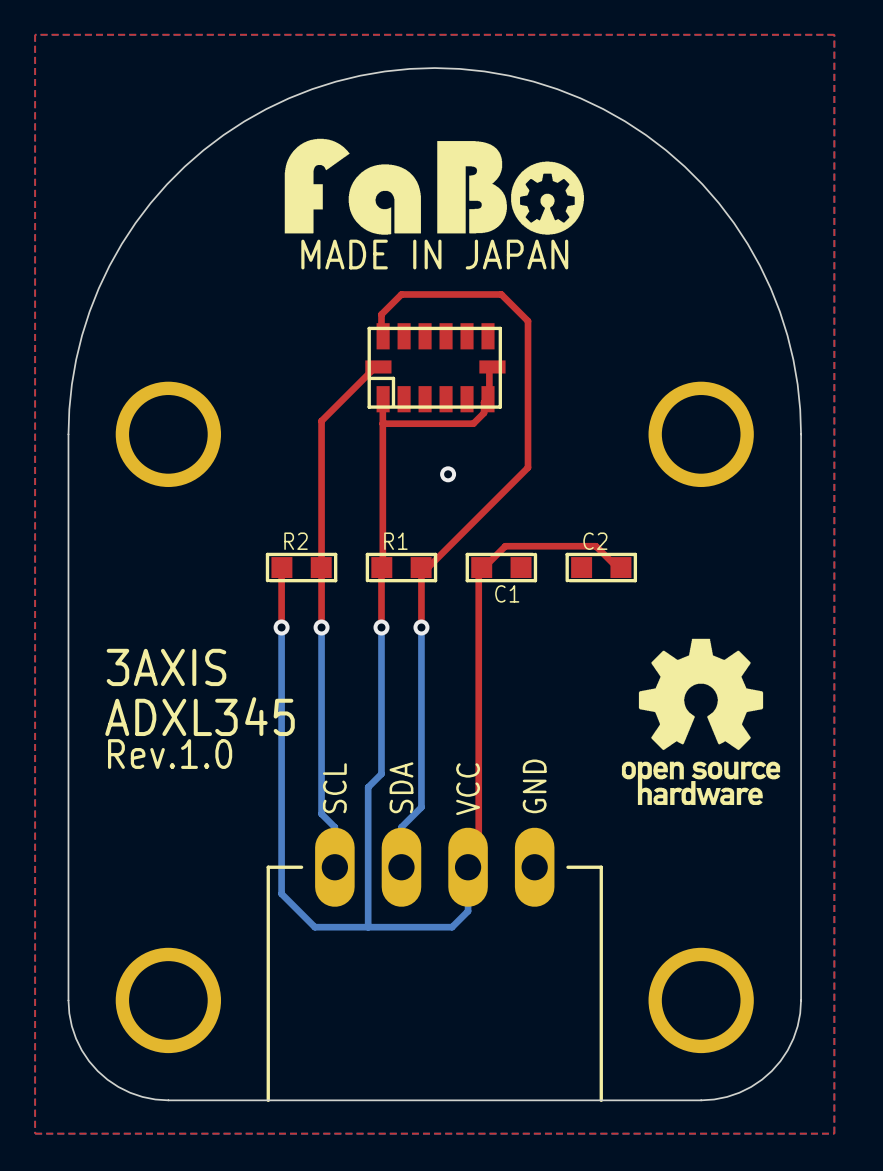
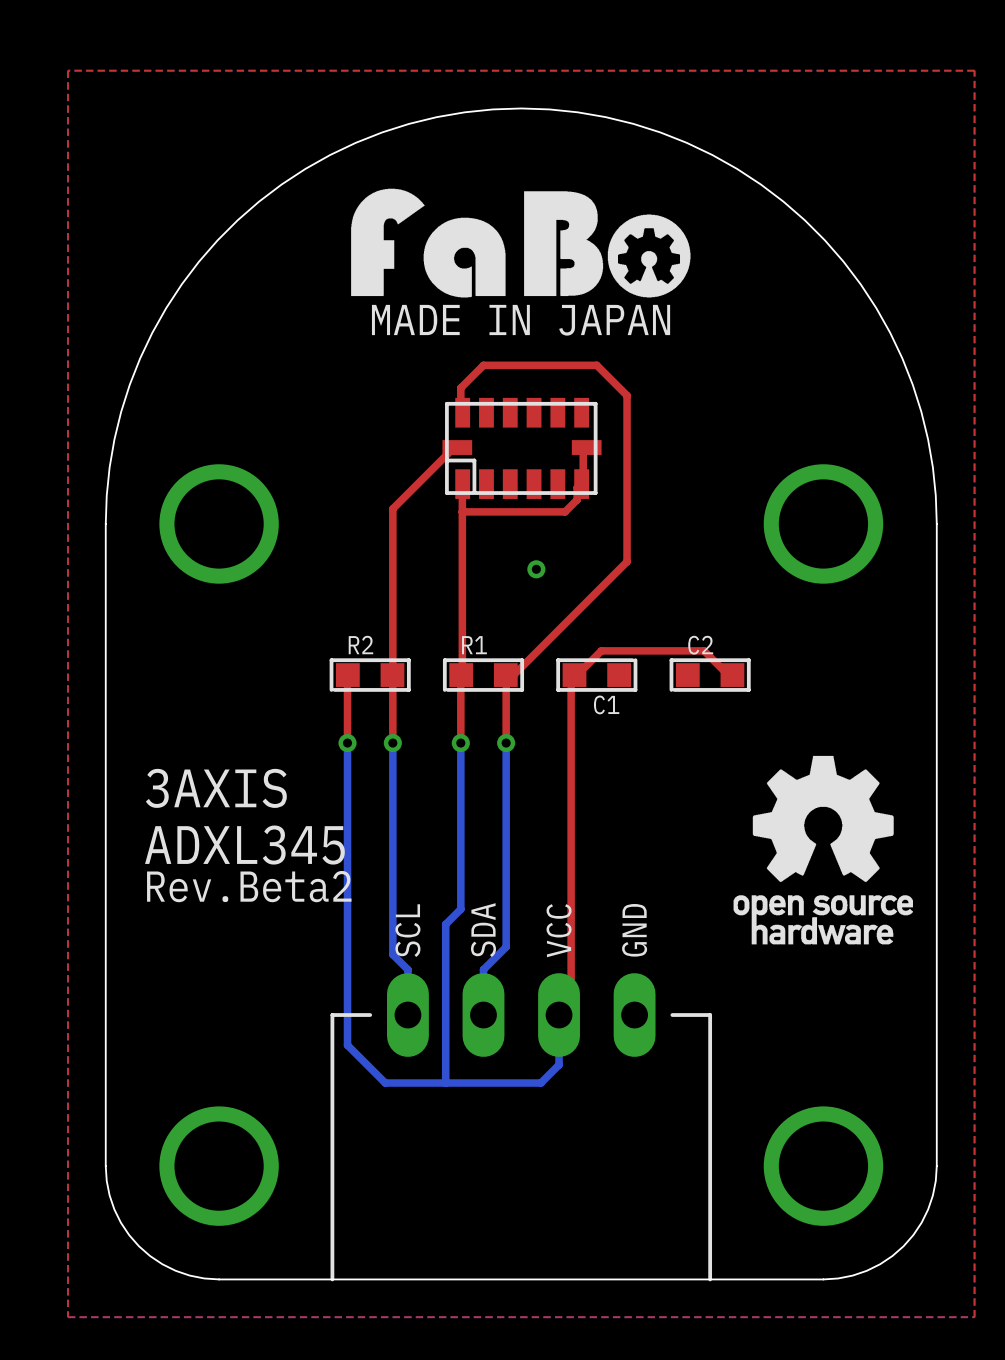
part footprint: [68, 68, 802, 1103] -> [105, 108, 937, 1282]
text: Rev.1.0 (170, 754) -> Rev.Beta2 (249, 886)

